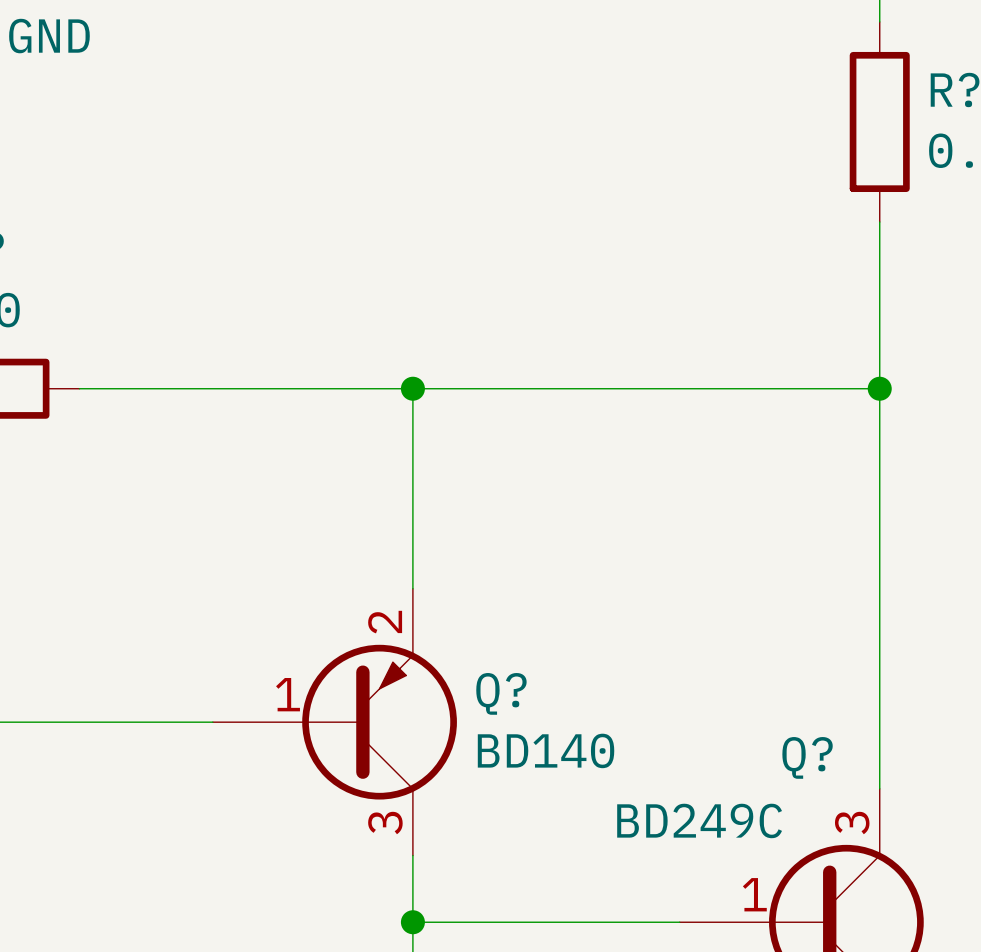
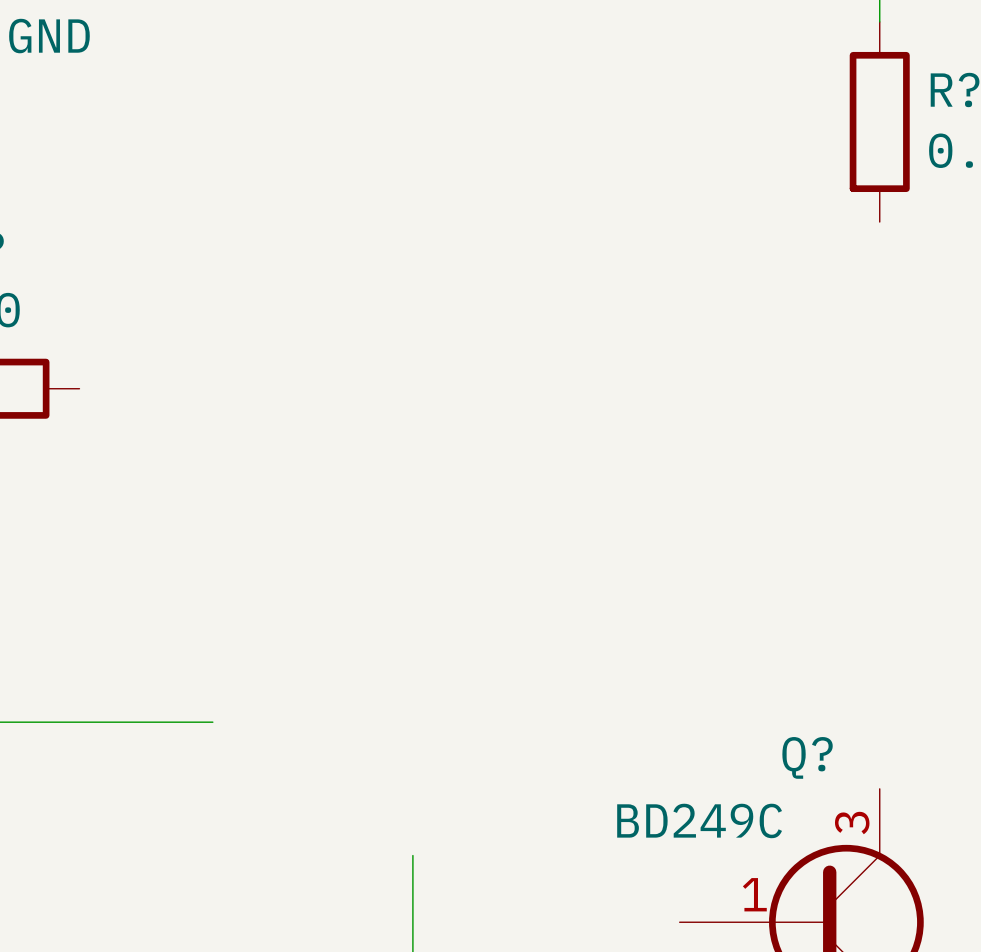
wire: (879, 222) (879, 788) -> none
wire: (79, 388) (879, 388) -> none
wire: (412, 388) (412, 588) -> none
junction: (412, 388) -> none
junction: (879, 388) -> none
Q?: BD140 (334, 722) -> none
wire: (412, 922) (679, 922) -> none
junction: (412, 922) -> none

